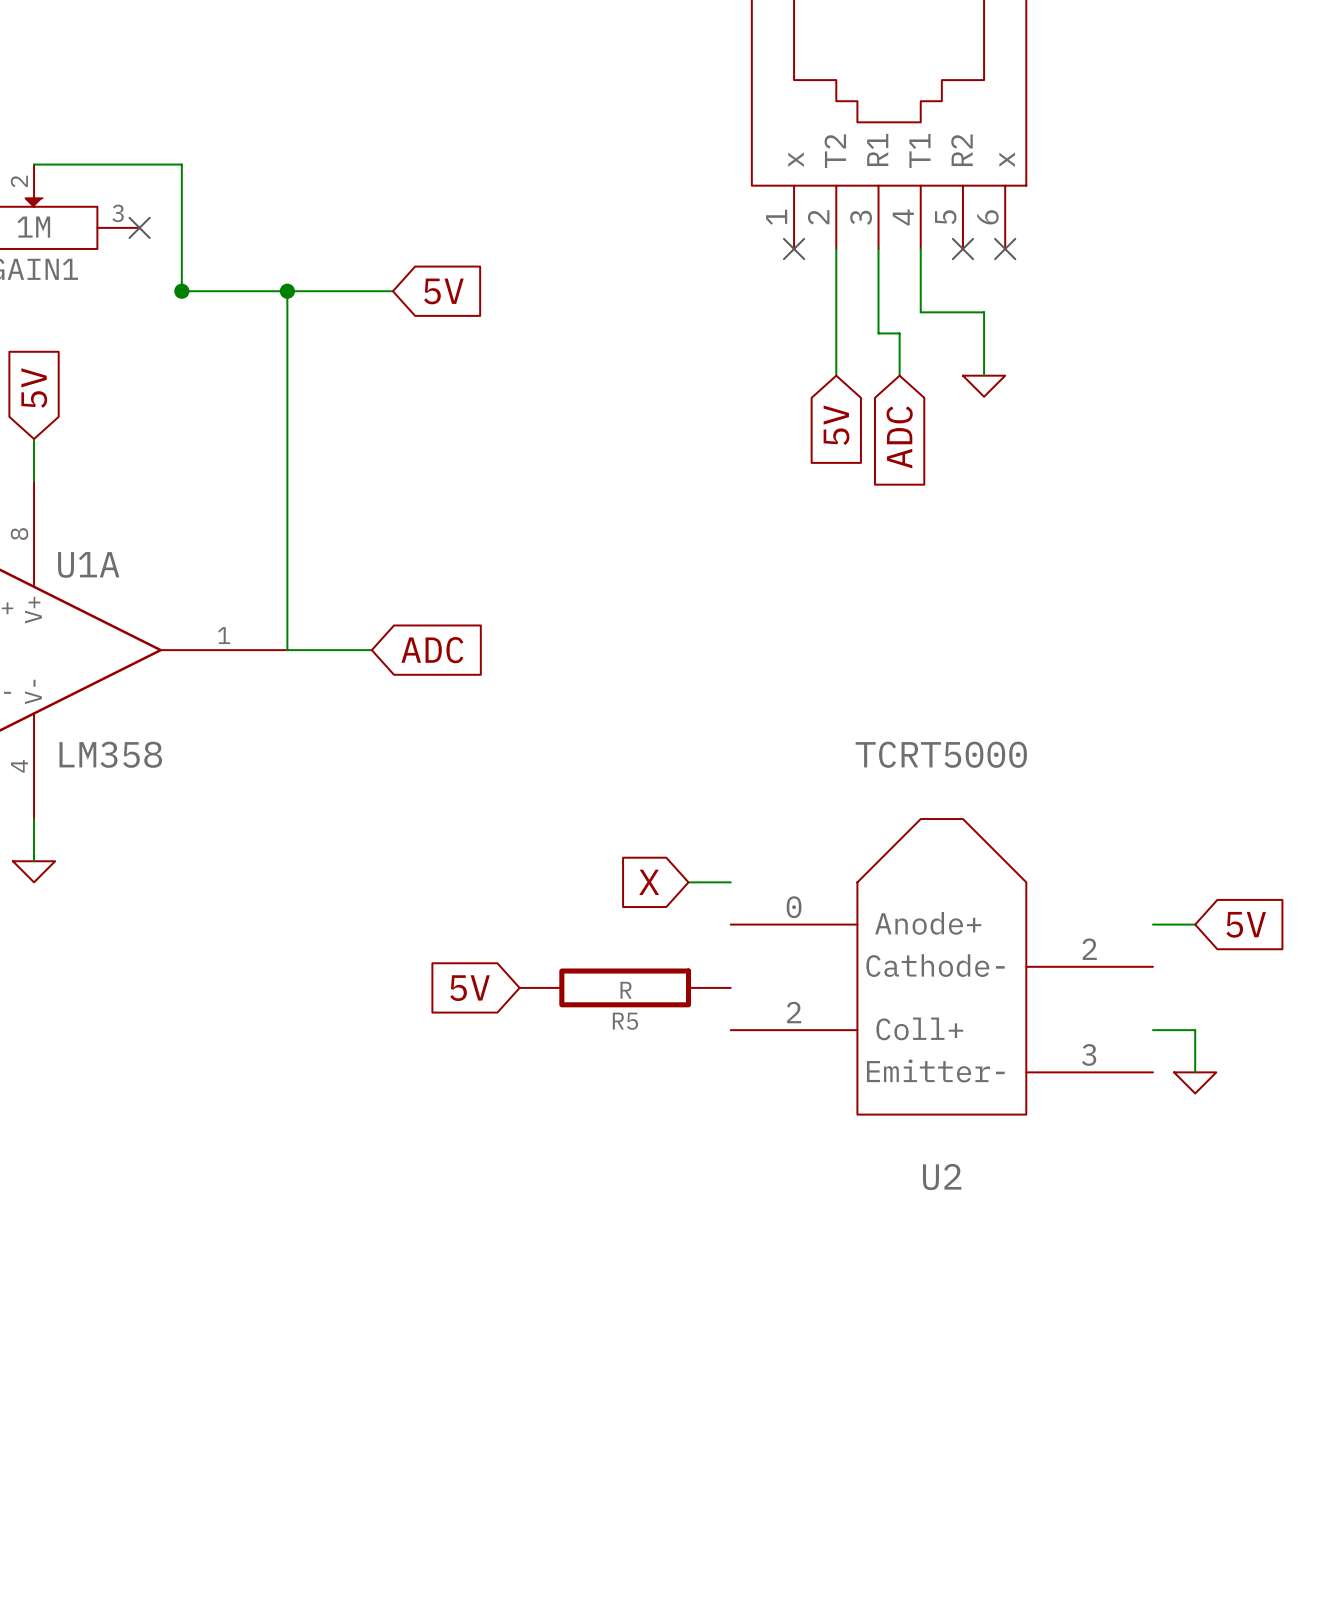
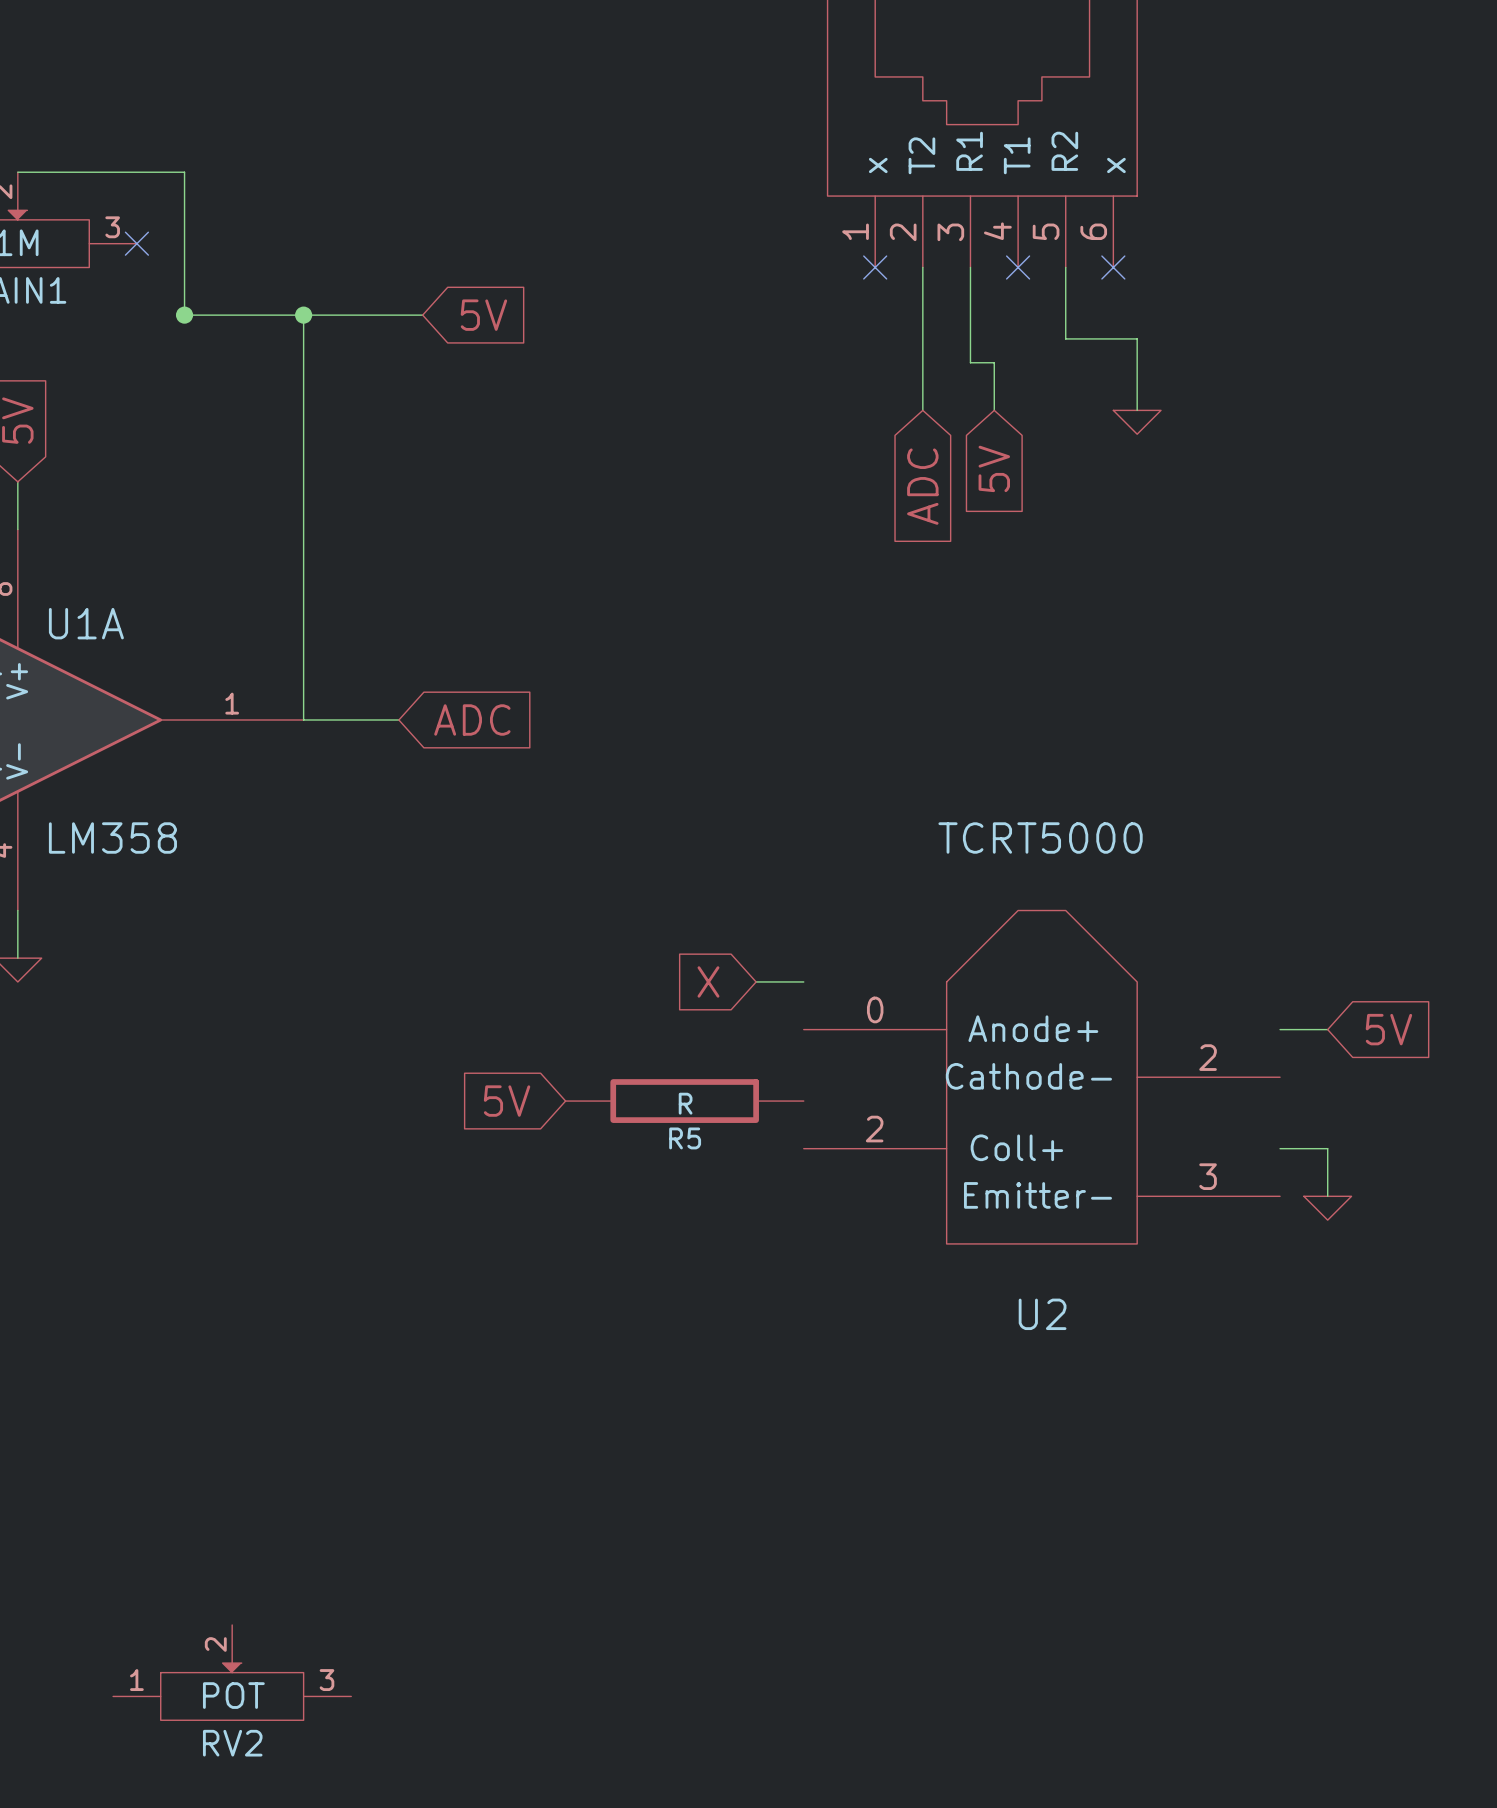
wire: (920, 249) (920, 312) (962, 312) -> (1065, 267) (1065, 338)
no-connect mark position: (962, 249) -> (1018, 267)
wire: (984, 312) (984, 375) -> (1089, 338) (1137, 338) (1137, 410)
power symbol position: (984, 386) -> (1137, 422)
global label: 5V (836, 425) -> ADC (922, 486)
global label: ADC (899, 437) -> 5V (994, 468)
RV2: none -> POT (232, 1672)

